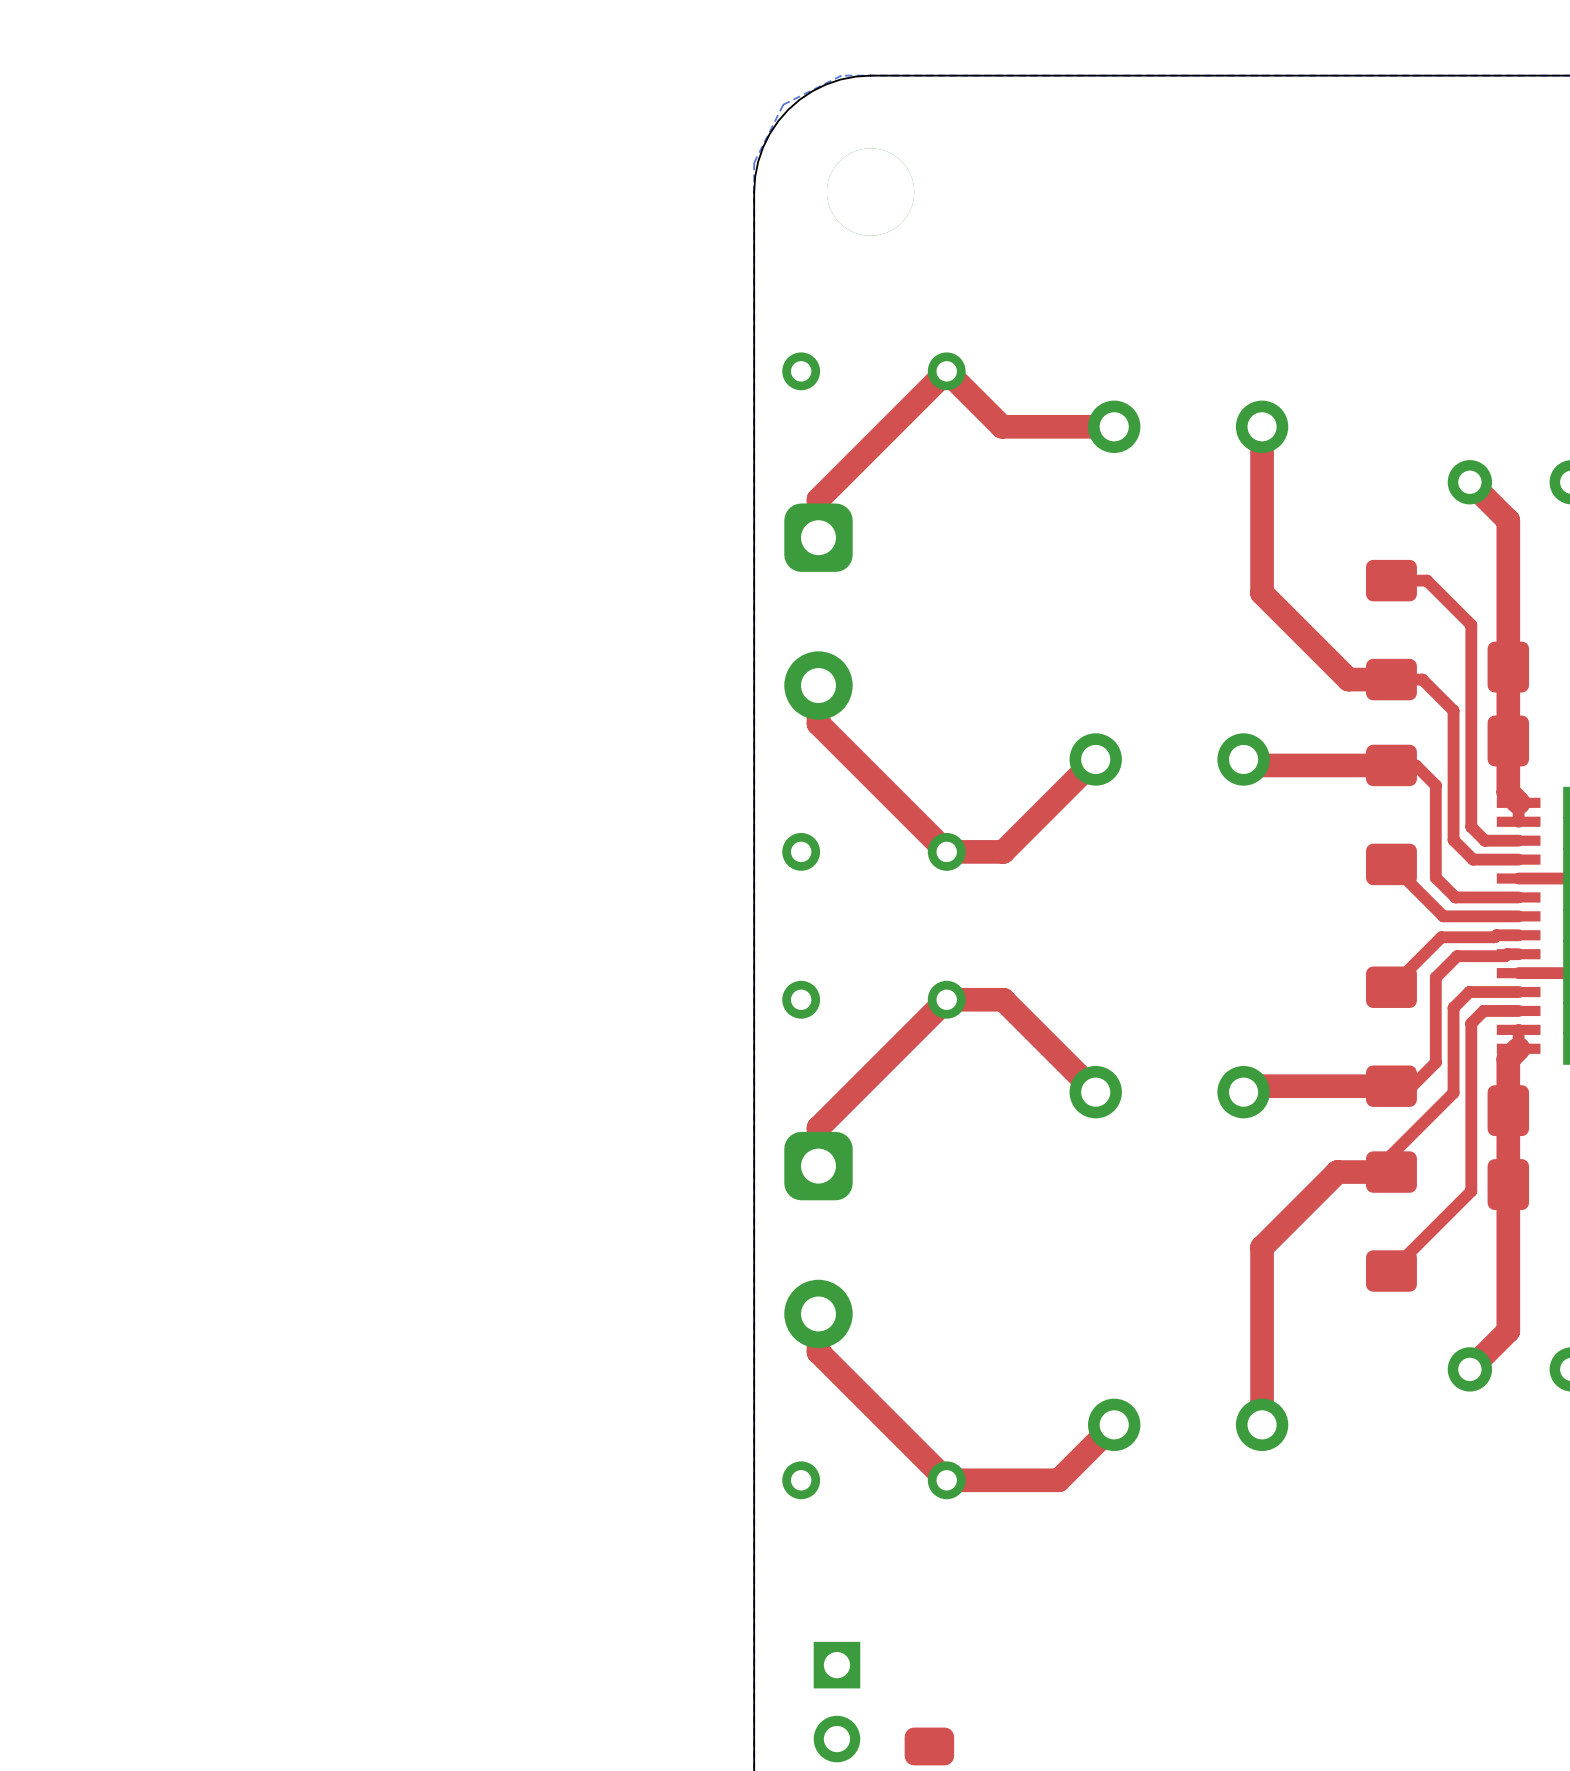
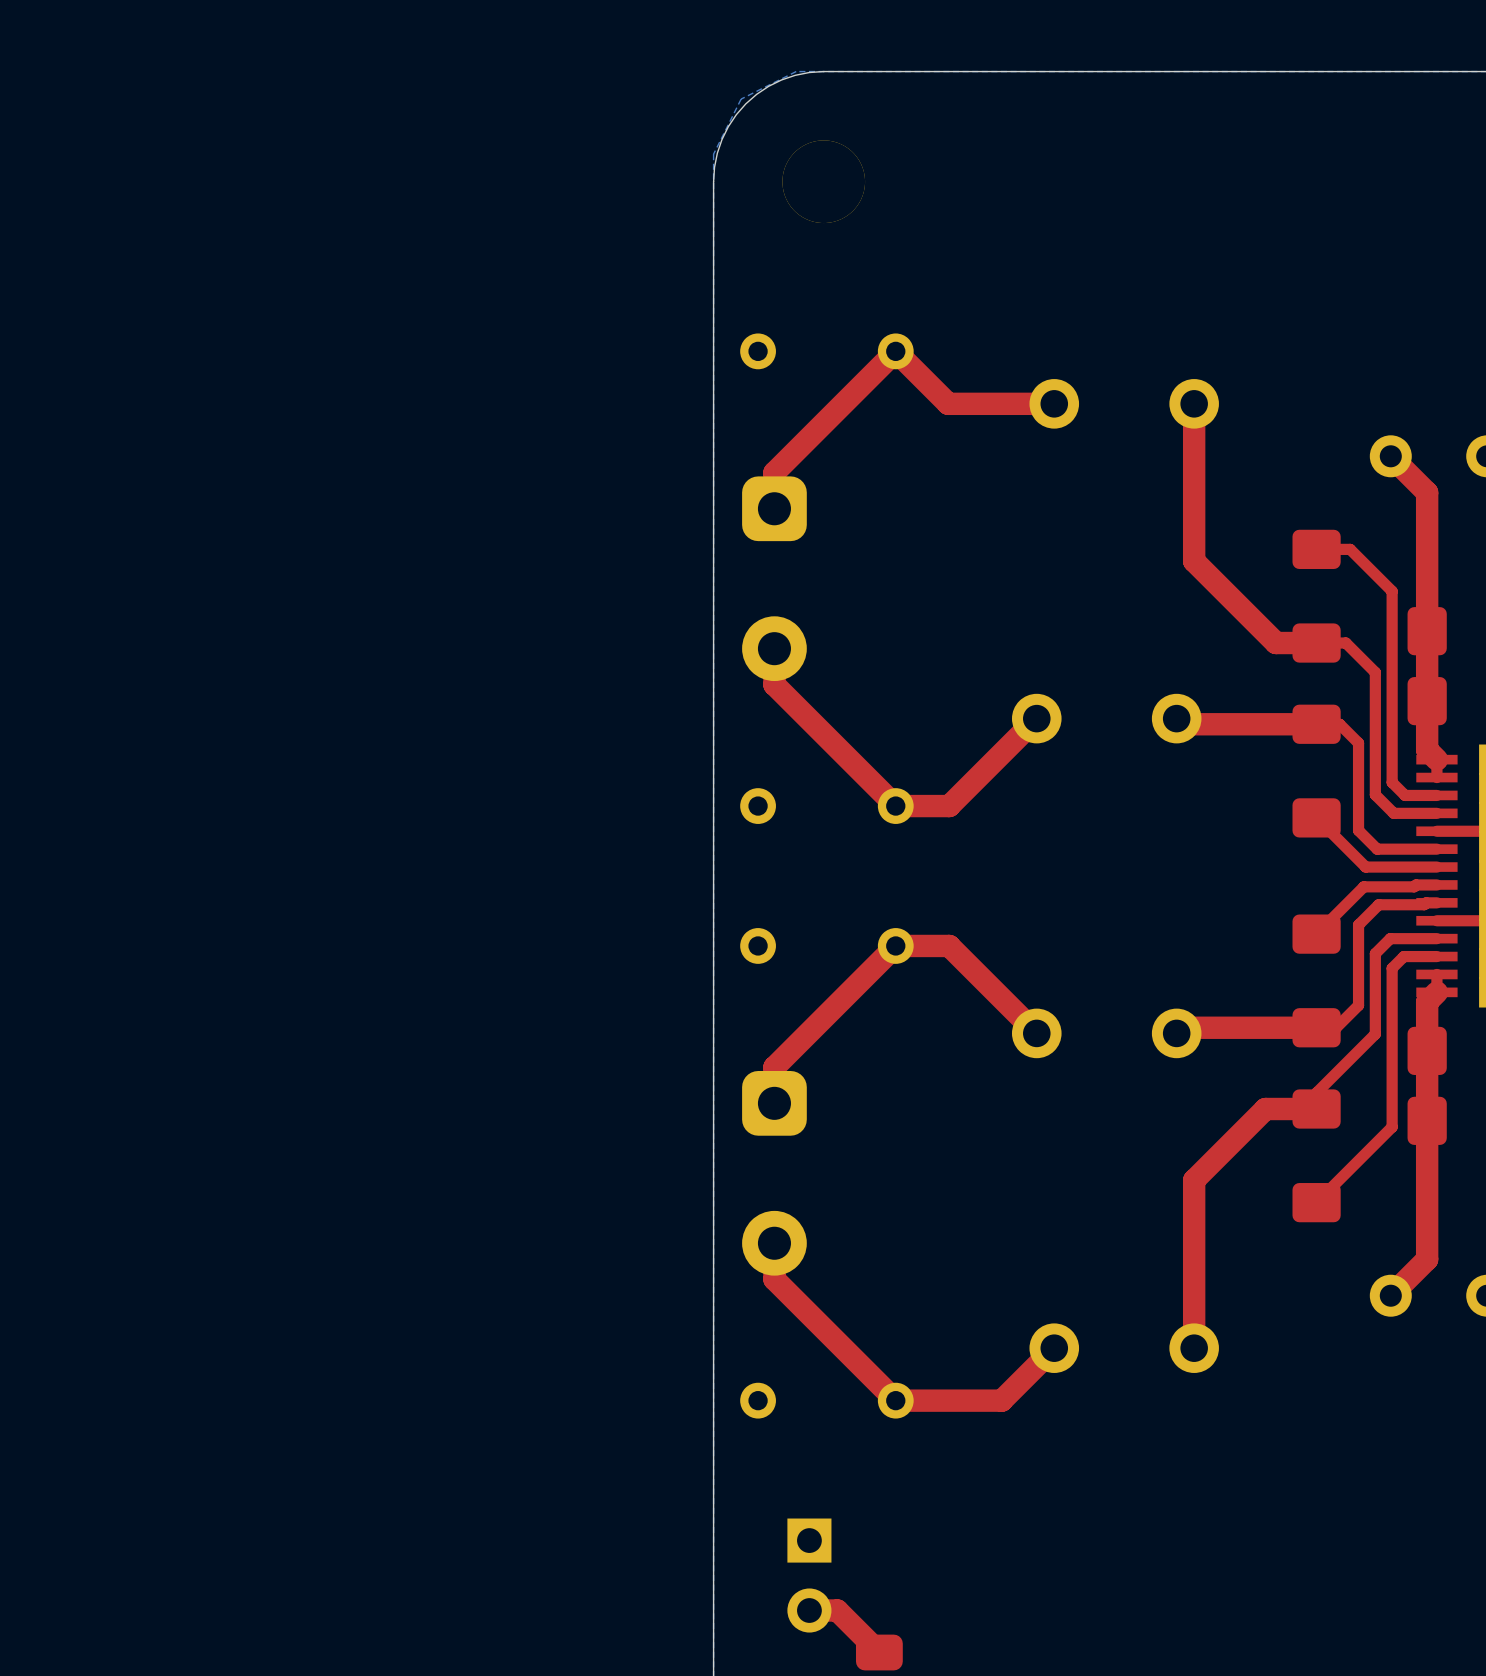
part position: (836, 1702) -> (809, 1575)
top track: none -> (809, 1610) (837, 1610) (879, 1652)

